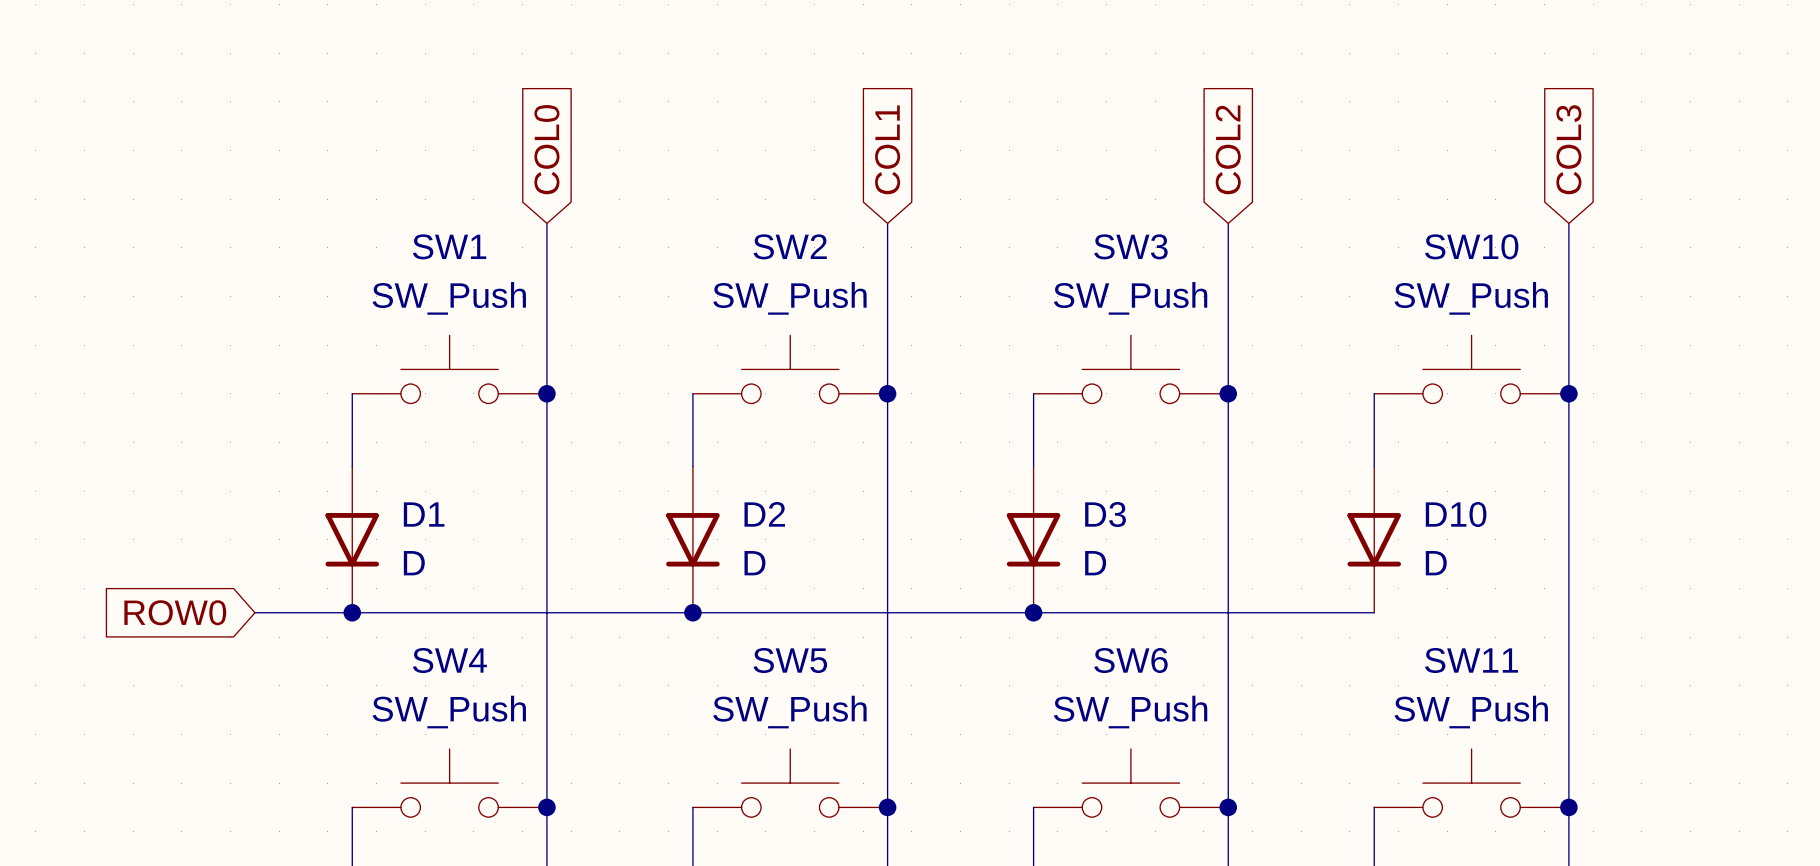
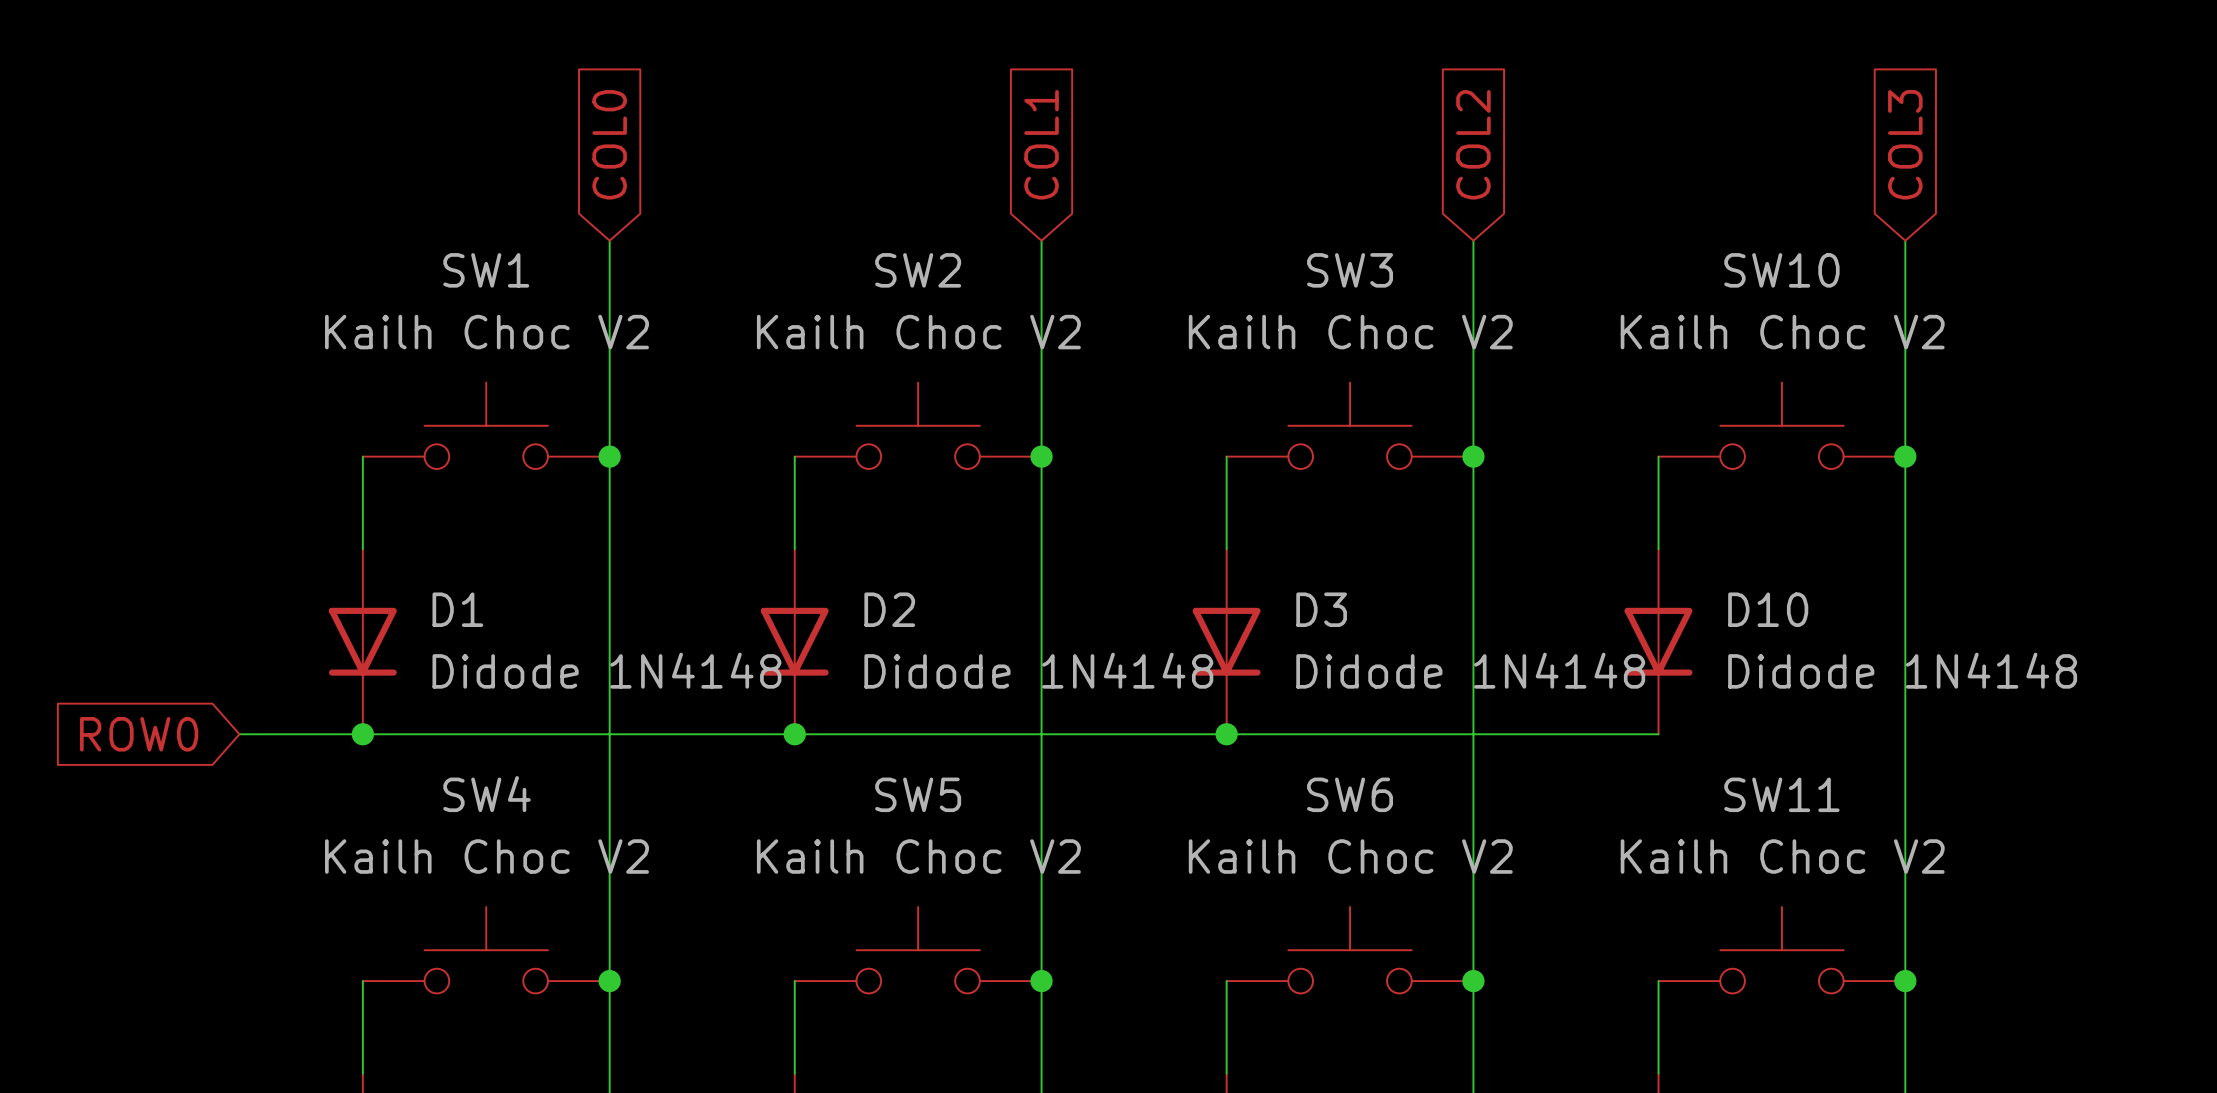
SW1 value: SW_Push (449, 298) -> Kailh Choc V2 (486, 332)
SW2 value: SW_Push (789, 298) -> Kailh Choc V2 (918, 332)
SW3 value: SW_Push (1130, 298) -> Kailh Choc V2 (1350, 332)
SW10 value: SW_Push (1471, 298) -> Kailh Choc V2 (1782, 332)
D1 value: D (414, 563) -> Didode 1N4148 (606, 670)
D2 value: D (754, 563) -> Didode 1N4148 (1038, 670)
D3 value: D (1095, 563) -> Didode 1N4148 (1470, 670)
D10 value: D (1436, 563) -> Didode 1N4148 (1902, 670)
SW4 value: SW_Push (449, 712) -> Kailh Choc V2 (486, 856)
SW5 value: SW_Push (789, 712) -> Kailh Choc V2 (918, 856)
SW6 value: SW_Push (1130, 712) -> Kailh Choc V2 (1350, 856)
SW11 value: SW_Push (1471, 712) -> Kailh Choc V2 (1782, 856)

